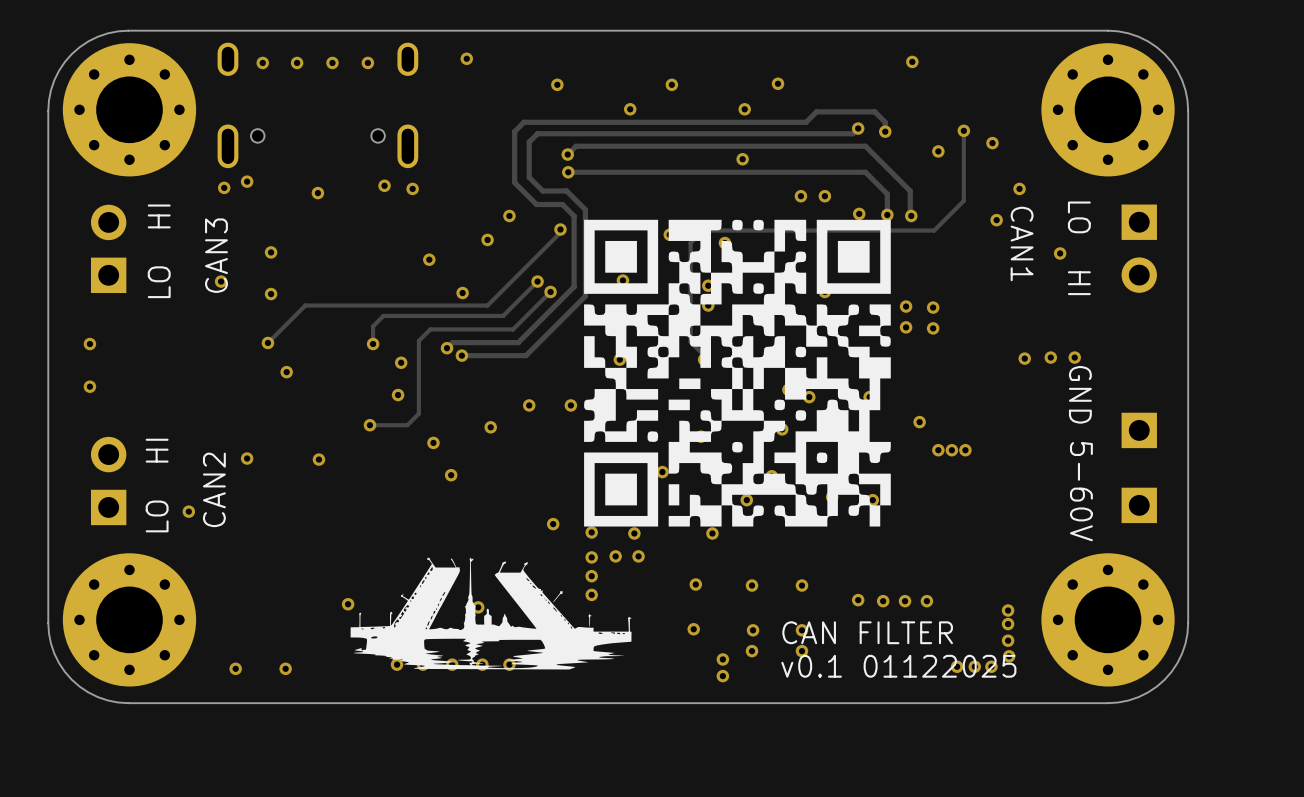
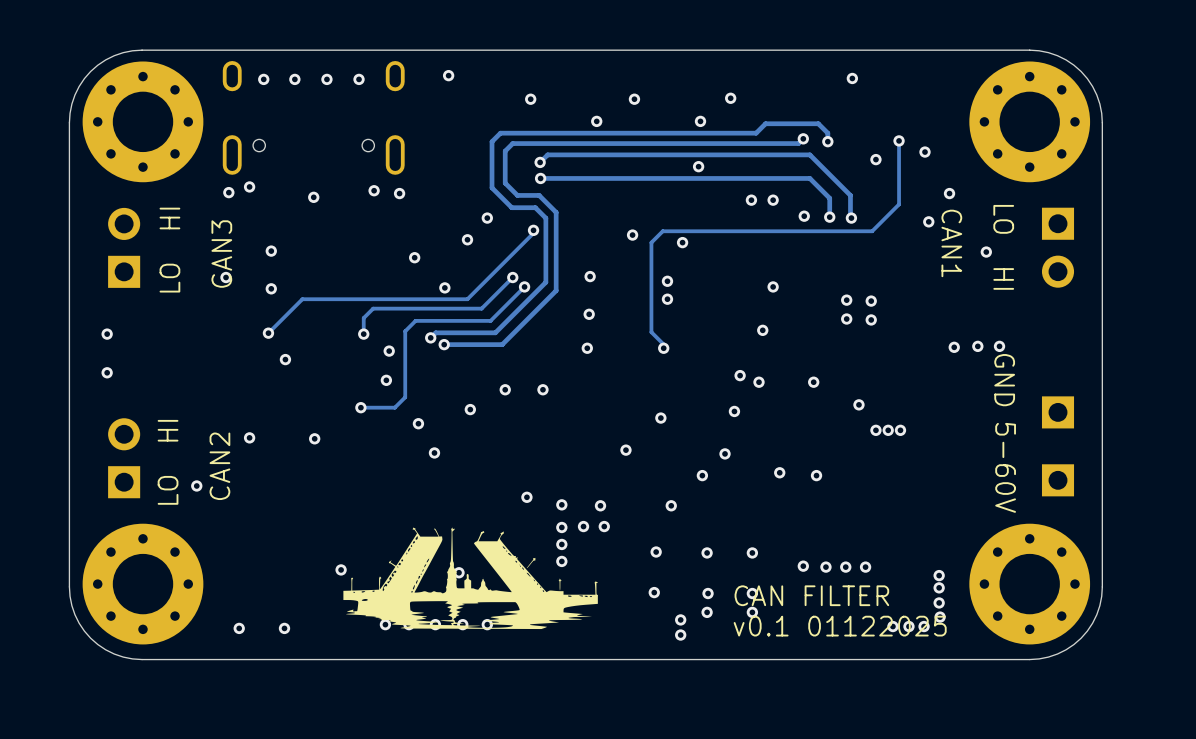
drawing: [584, 219, 891, 527] -> none

